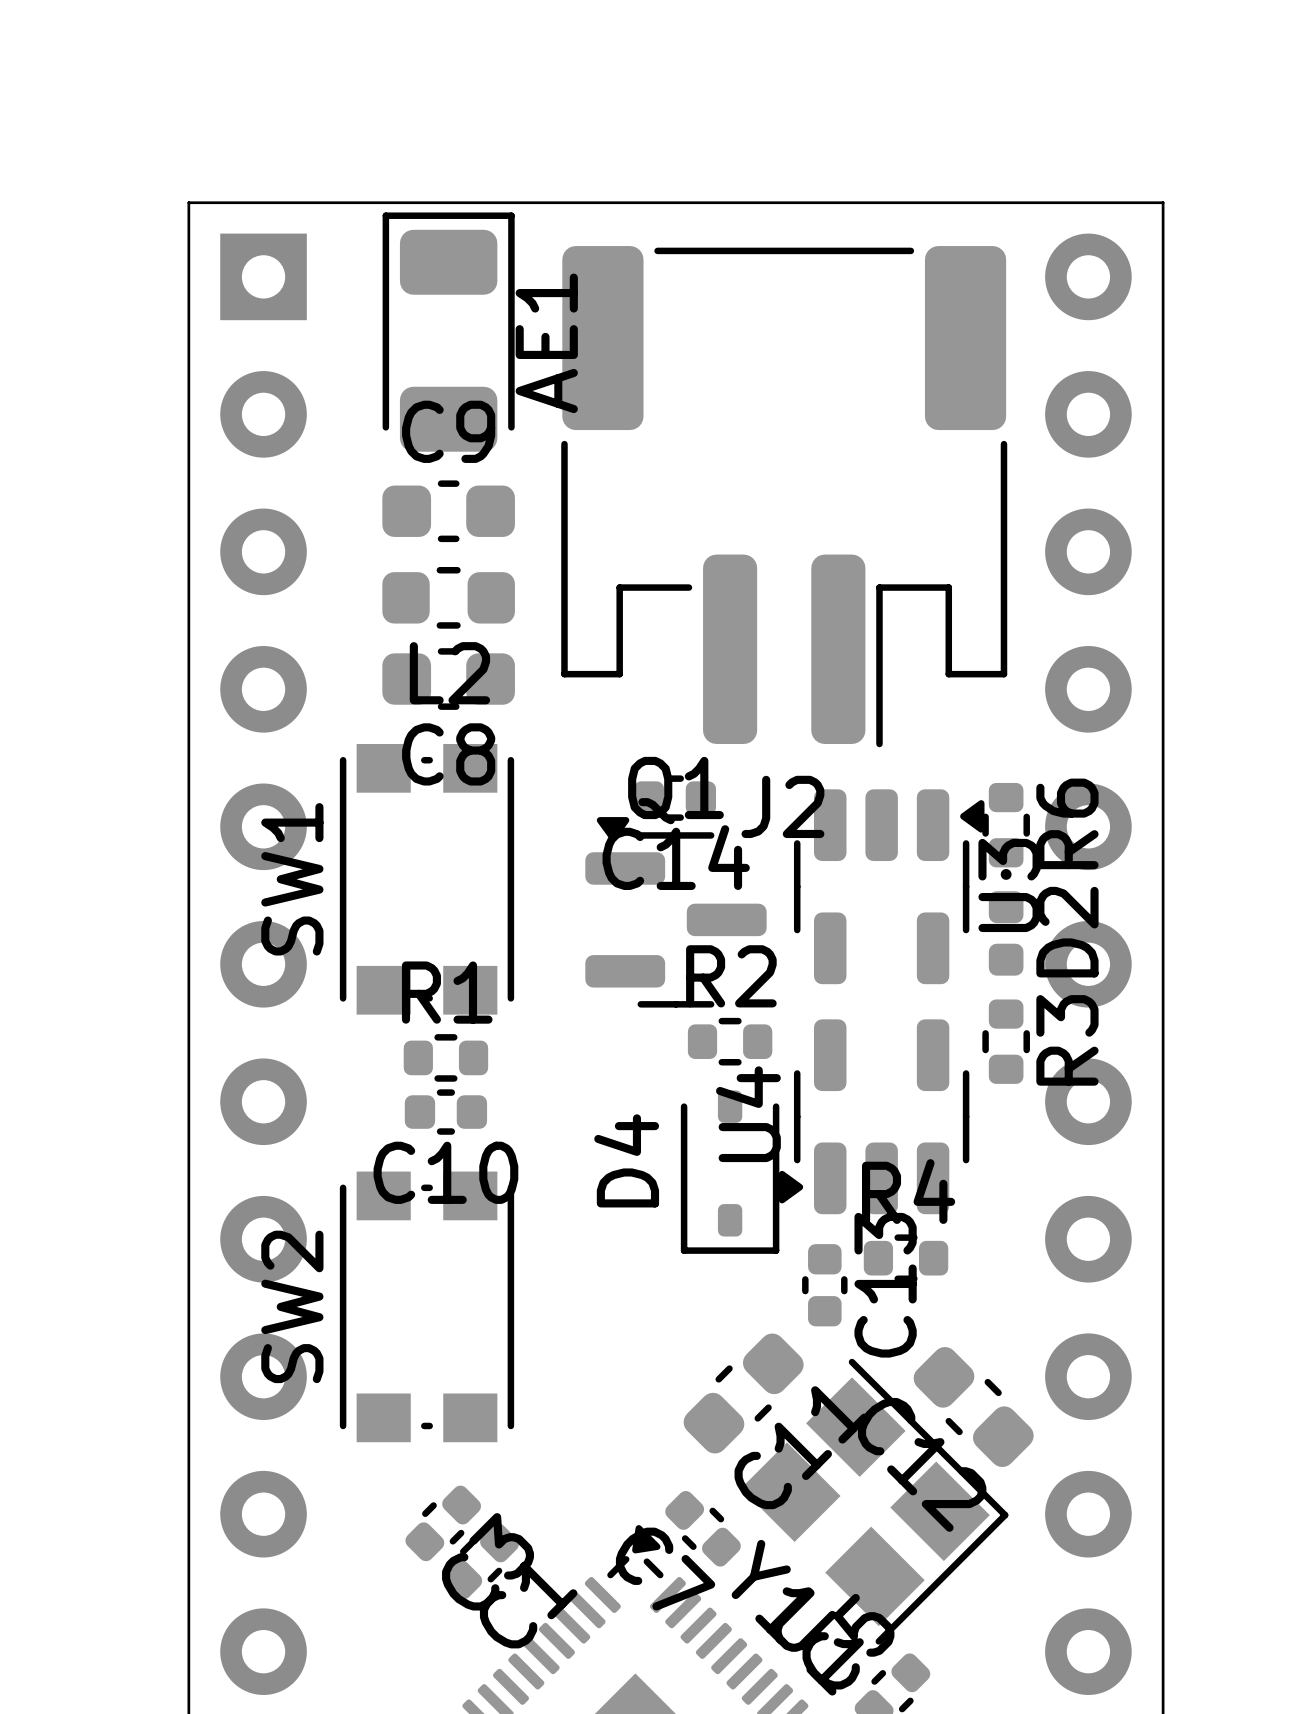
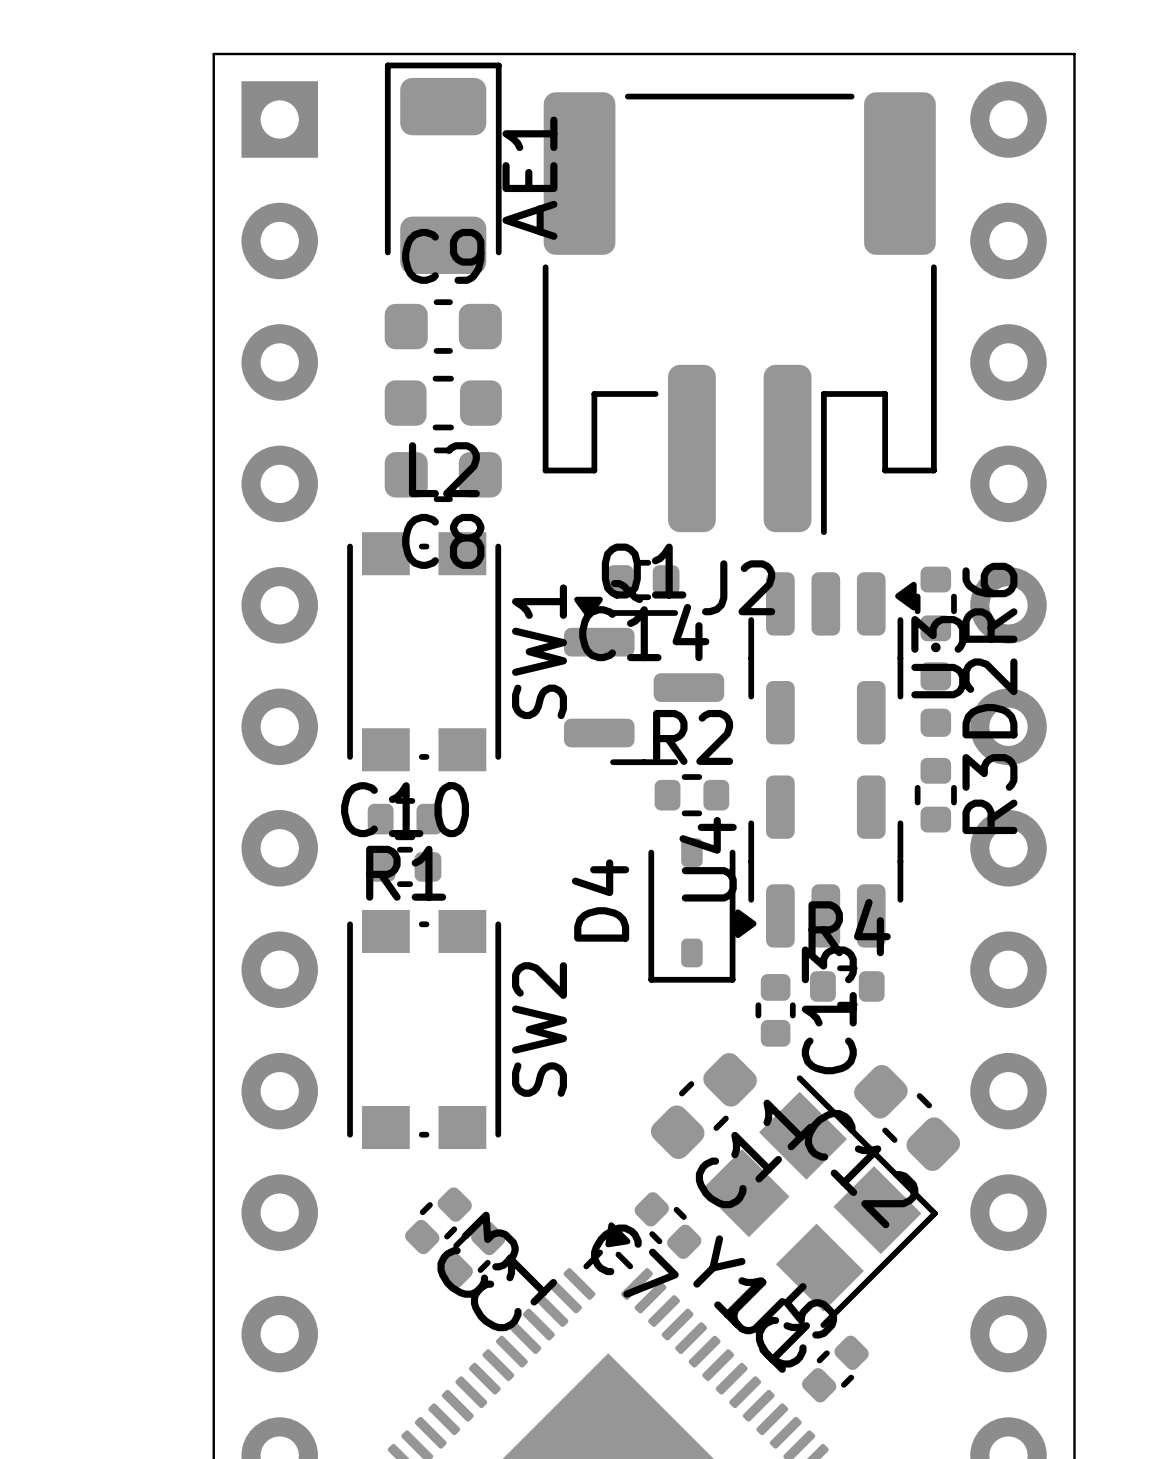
SW1 name position: SW1 (292, 879) -> SW1 (539, 651)
R1 name position: R1 (447, 992) -> R1 (406, 873)
R1 position: (445, 1057) -> (405, 819)
C10 position: (445, 1112) -> (405, 866)
C10 name position: C10 (445, 1172) -> C10 (405, 809)
SW2 name position: SW2 (292, 1306) -> SW2 (539, 1029)

